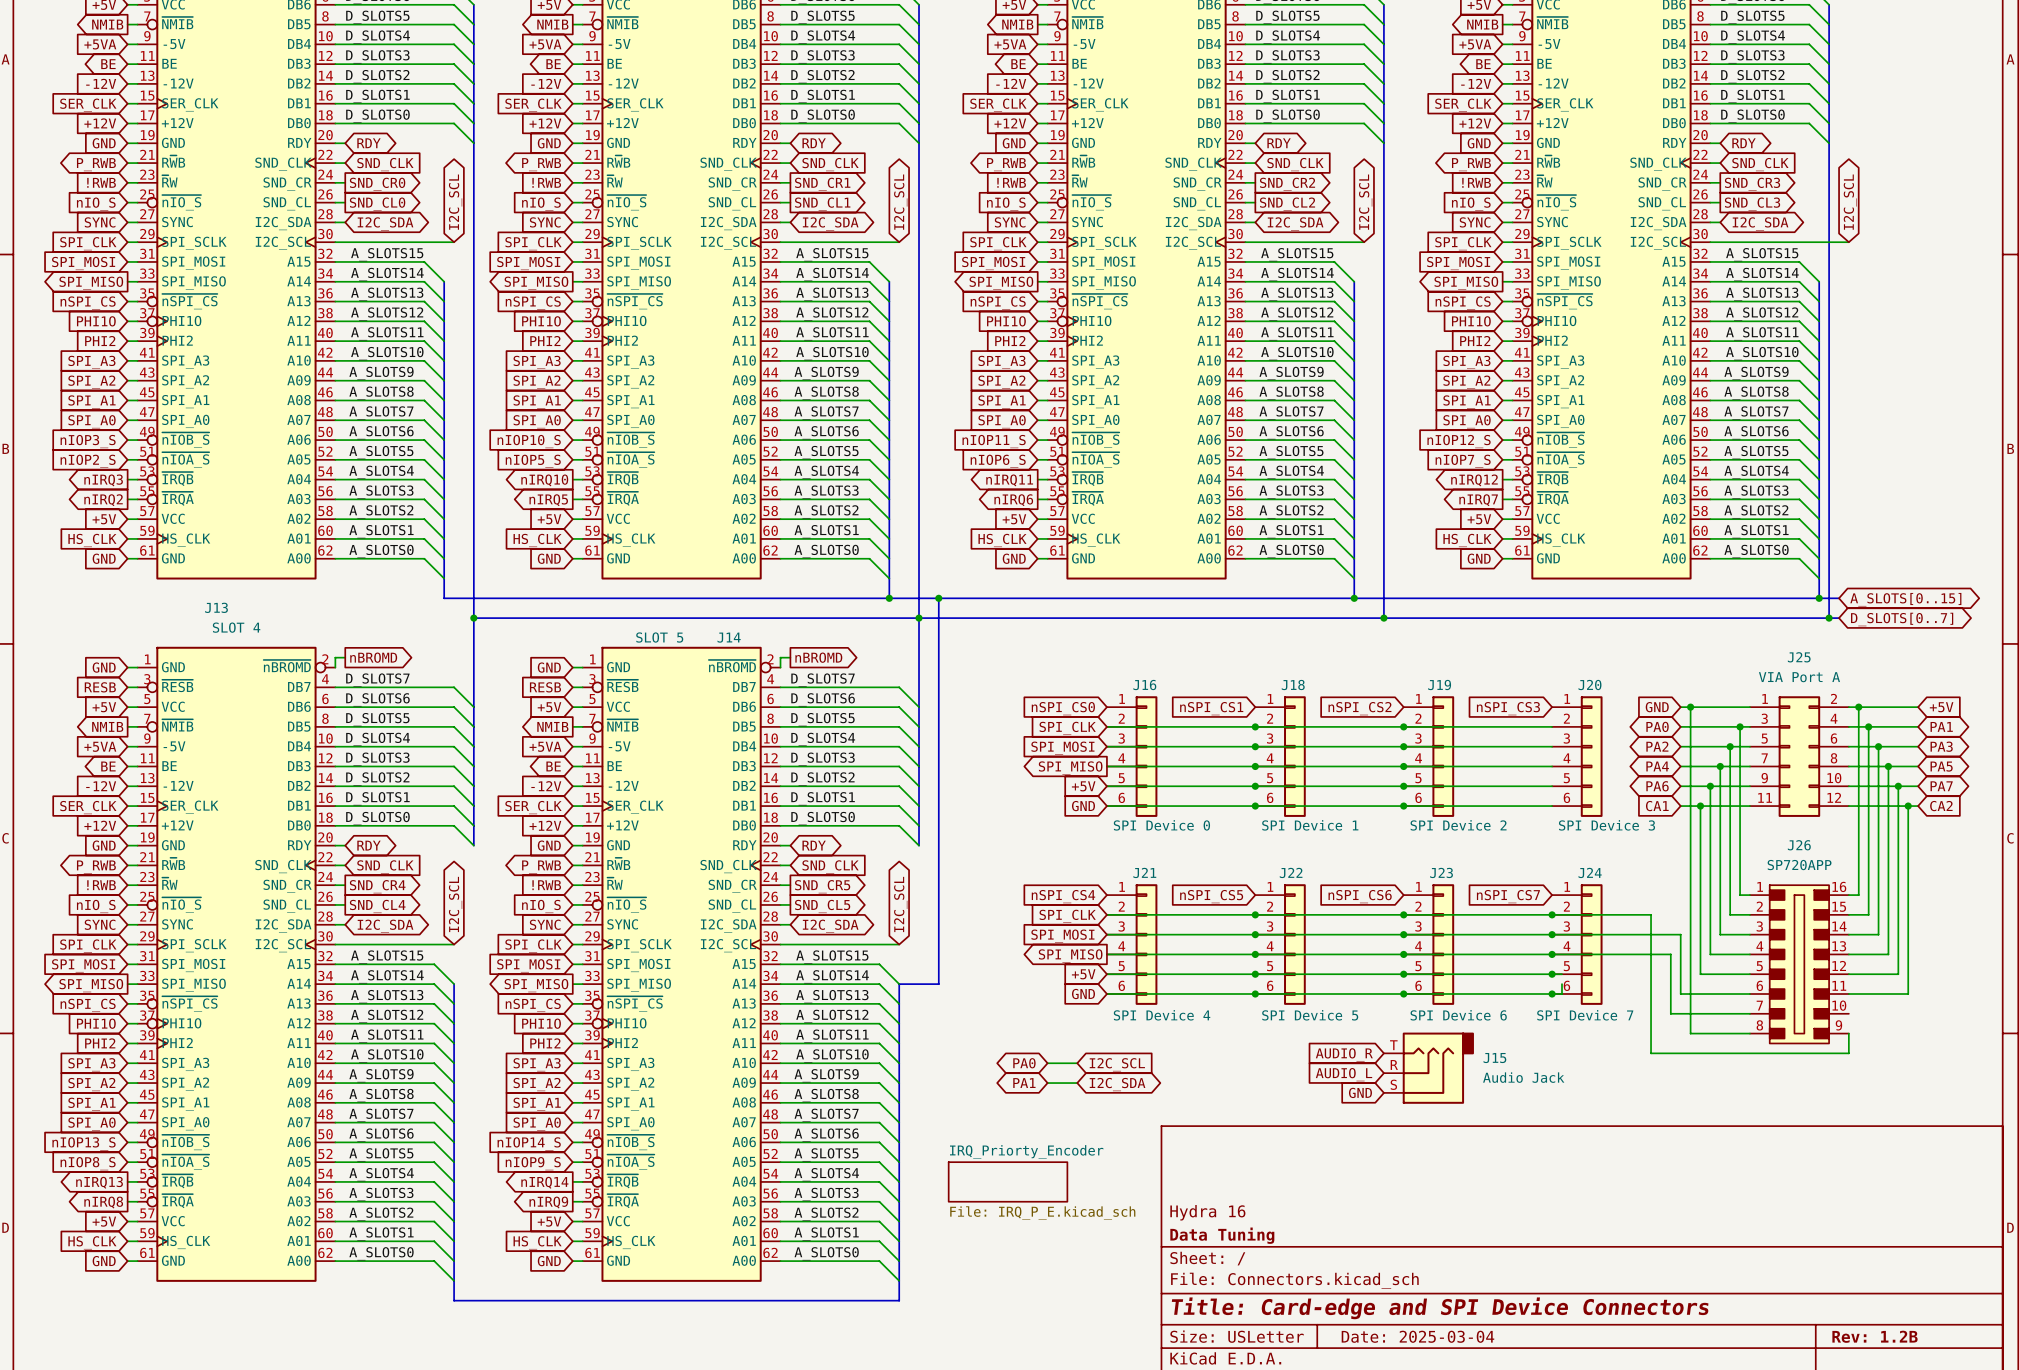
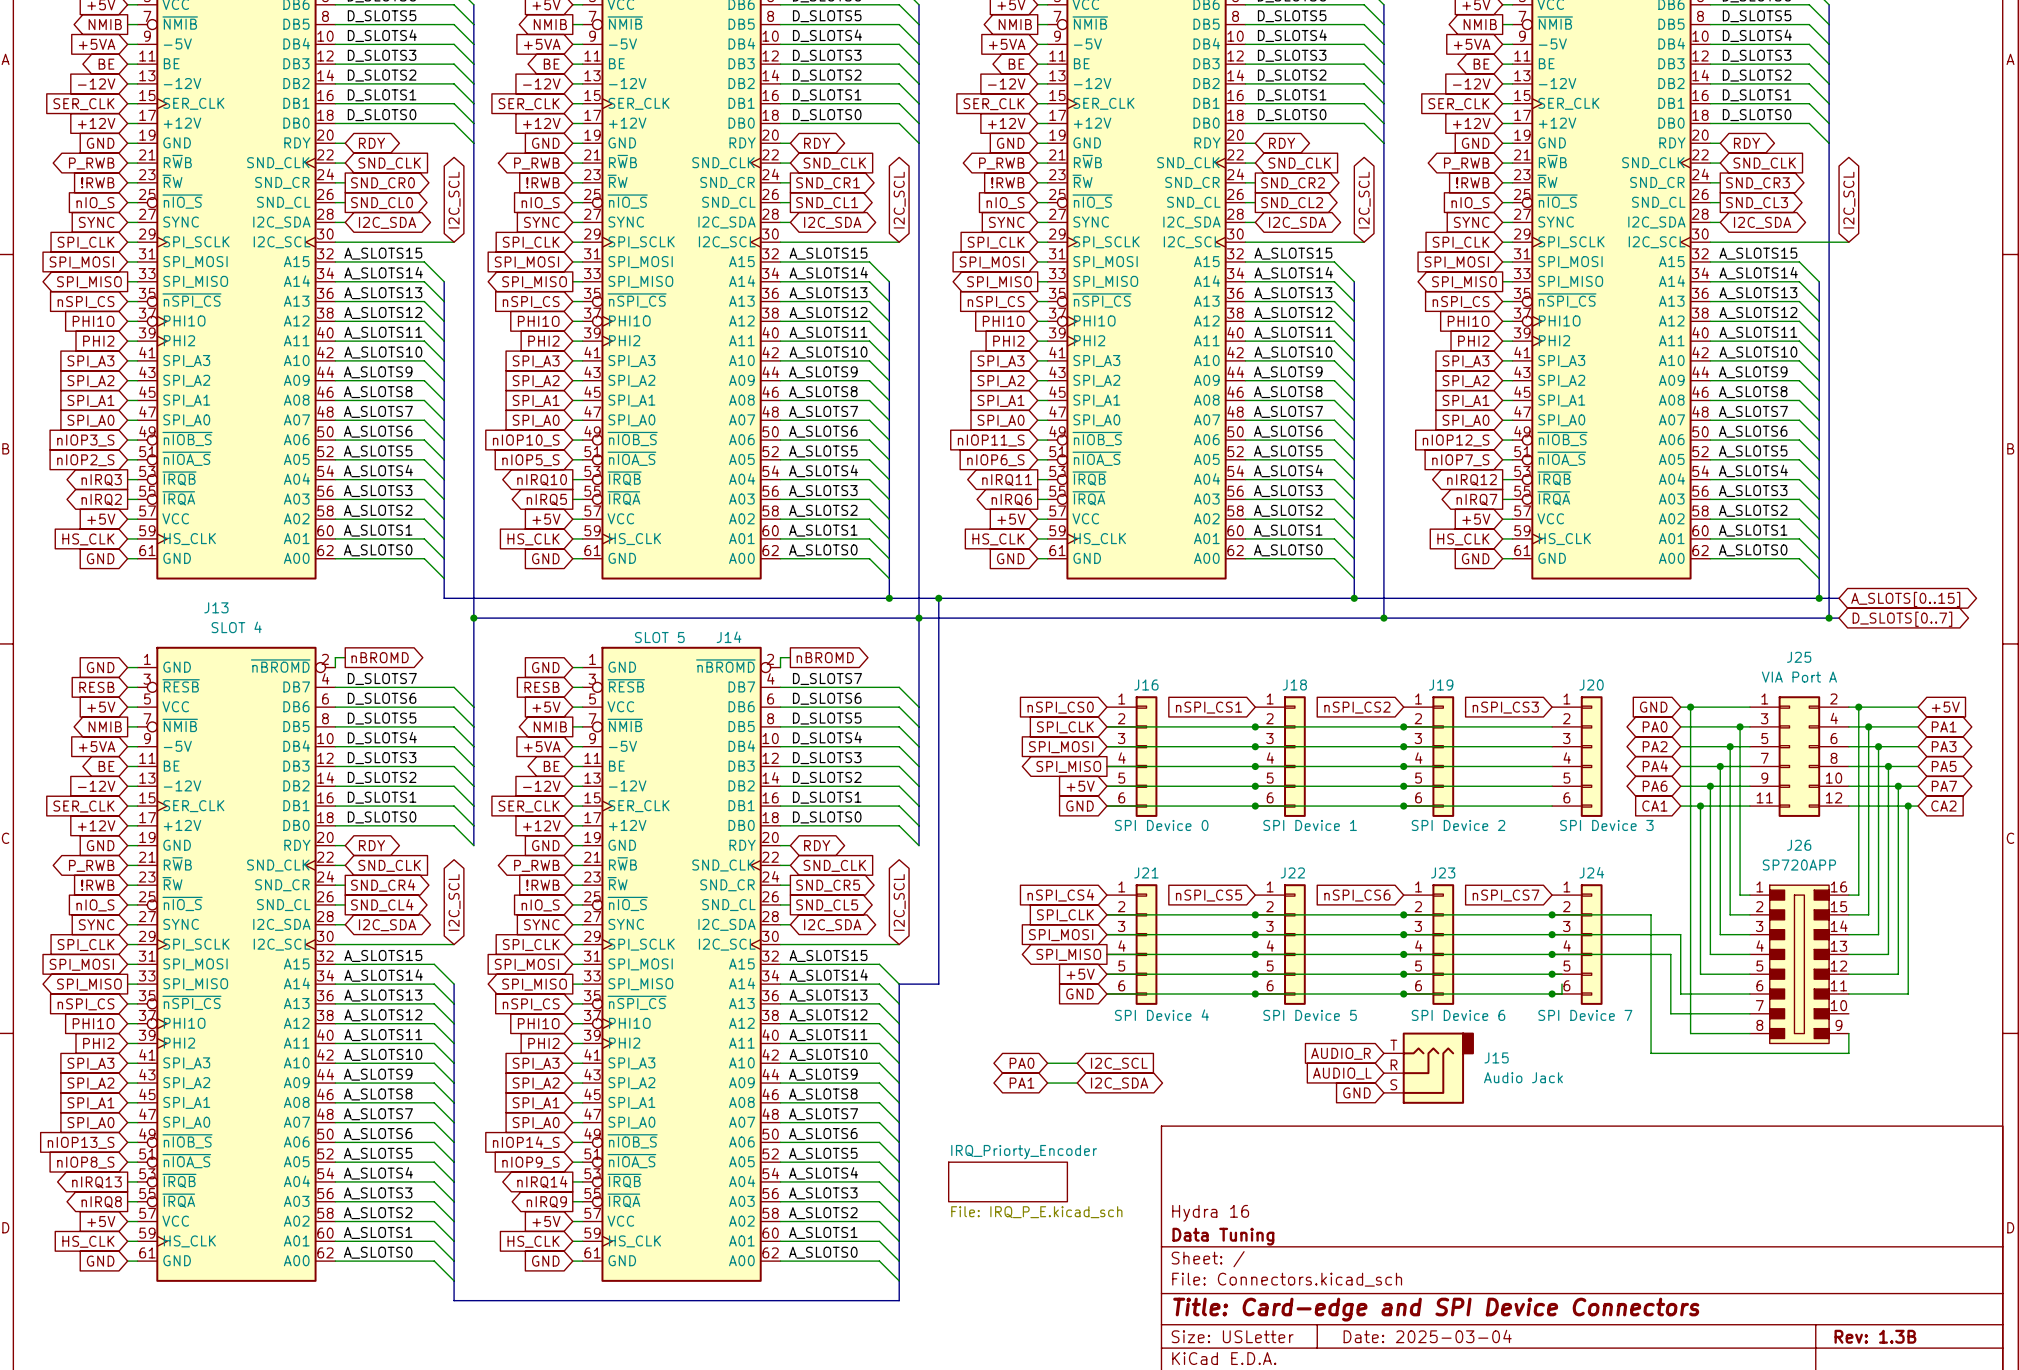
title block: Rev: 1.2B (1874, 1336) -> Rev: 1.3B (1875, 1336)

